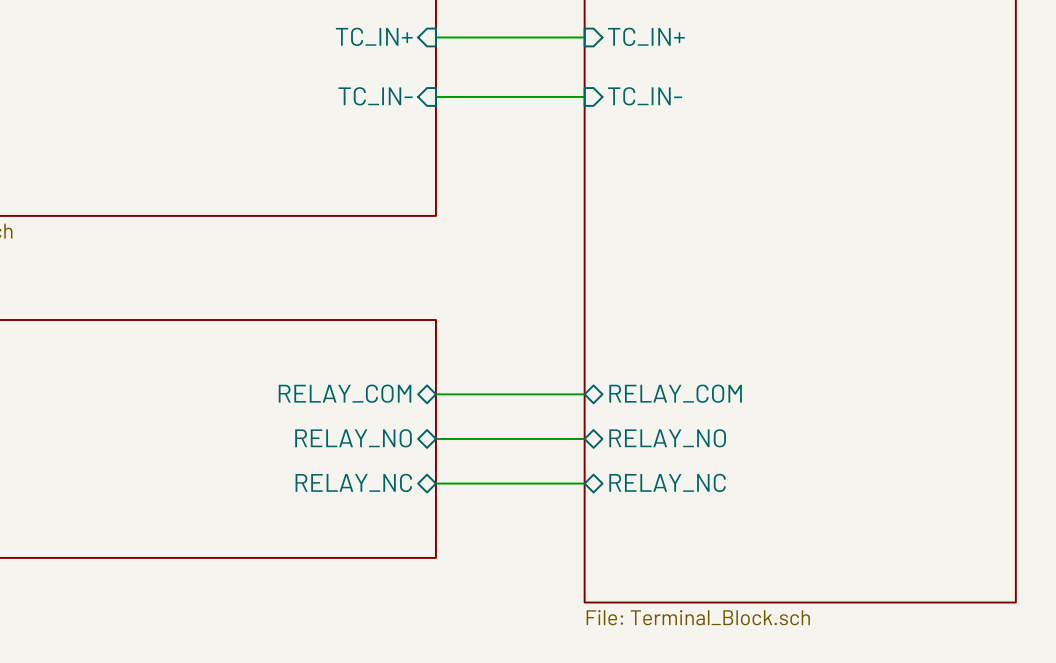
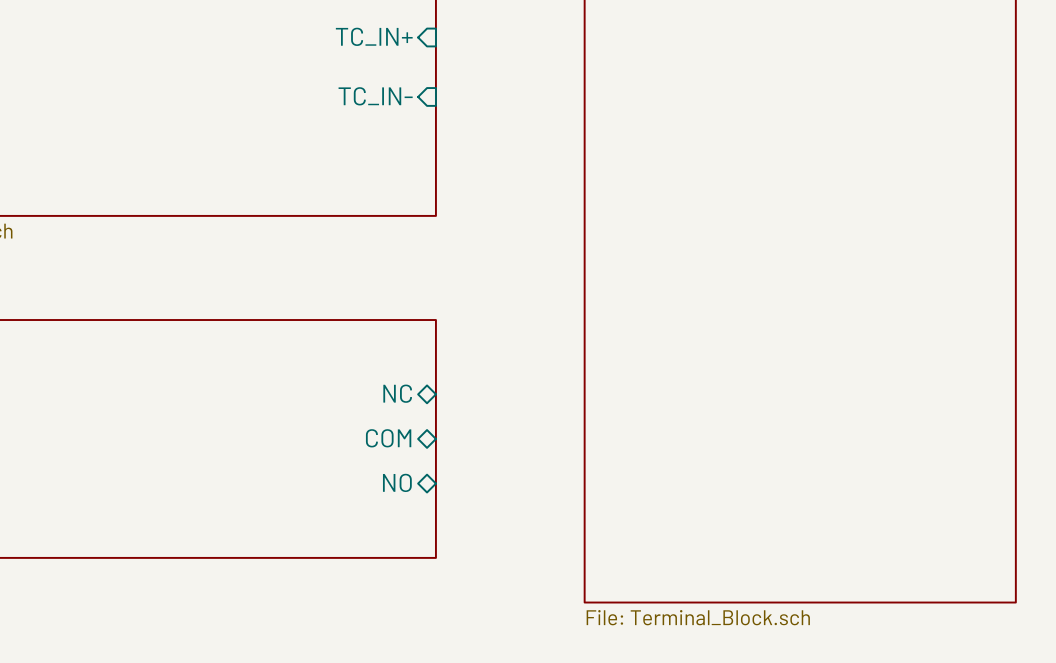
sheet pin: TC_IN+ (646, 36) -> none
wire: (435, 37) (584, 37) -> none
wire: (435, 96) (584, 96) -> none
sheet pin: TC_IN- (645, 96) -> none
sheet pin: RELAY_COM (345, 393) -> NC (397, 393)
sheet pin: RELAY_COM (675, 393) -> none
wire: (435, 394) (584, 394) -> none
sheet pin: RELAY_NO (353, 438) -> COM (388, 438)
wire: (435, 438) (584, 438) -> none
sheet pin: RELAY_NO (667, 438) -> none
sheet pin: RELAY_NC (353, 482) -> NO (397, 482)
sheet pin: RELAY_NC (667, 482) -> none
wire: (435, 483) (584, 483) -> none

